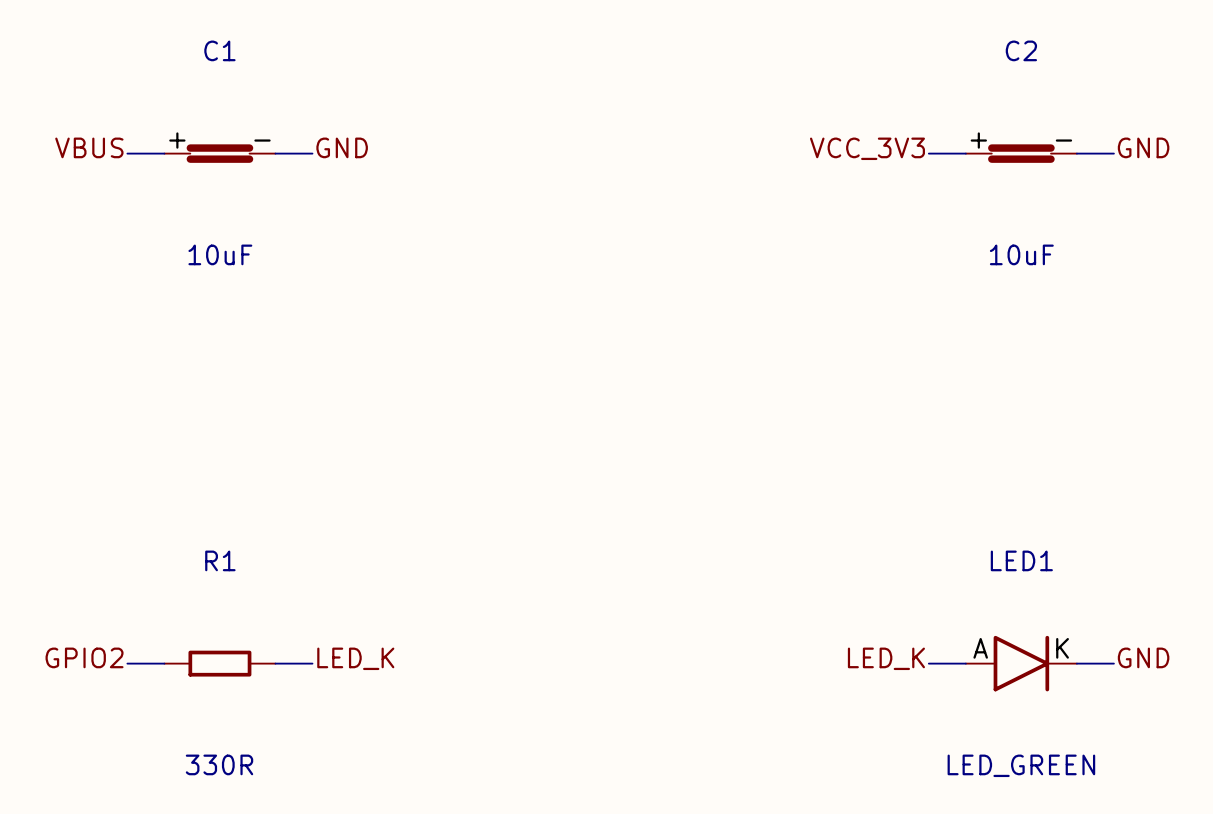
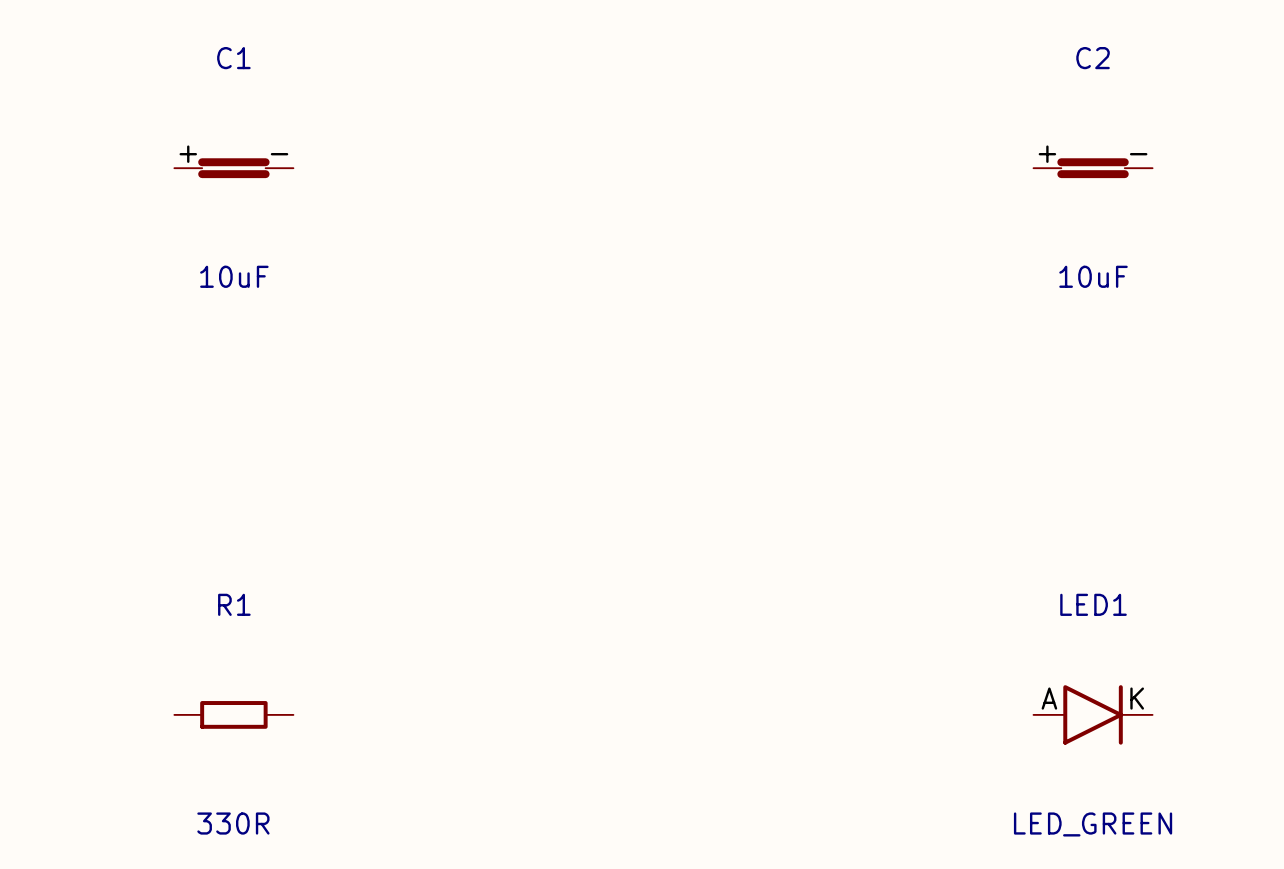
label: VBUS (89, 147) -> none
label: GND (342, 147) -> none
label: GND (1143, 147) -> none
label: VCC_3V3 (867, 148) -> none
wire: (127, 153) (164, 153) -> none
wire: (275, 153) (312, 153) -> none
wire: (928, 153) (965, 153) -> none
wire: (1076, 153) (1113, 153) -> none
label: GPIO2 (84, 657) -> none
label: GND (1143, 657) -> none
label: LED_K (355, 658) -> none
label: LED_K (886, 658) -> none
wire: (127, 663) (164, 663) -> none
wire: (275, 663) (312, 663) -> none
wire: (928, 663) (965, 663) -> none
wire: (1076, 663) (1113, 663) -> none

